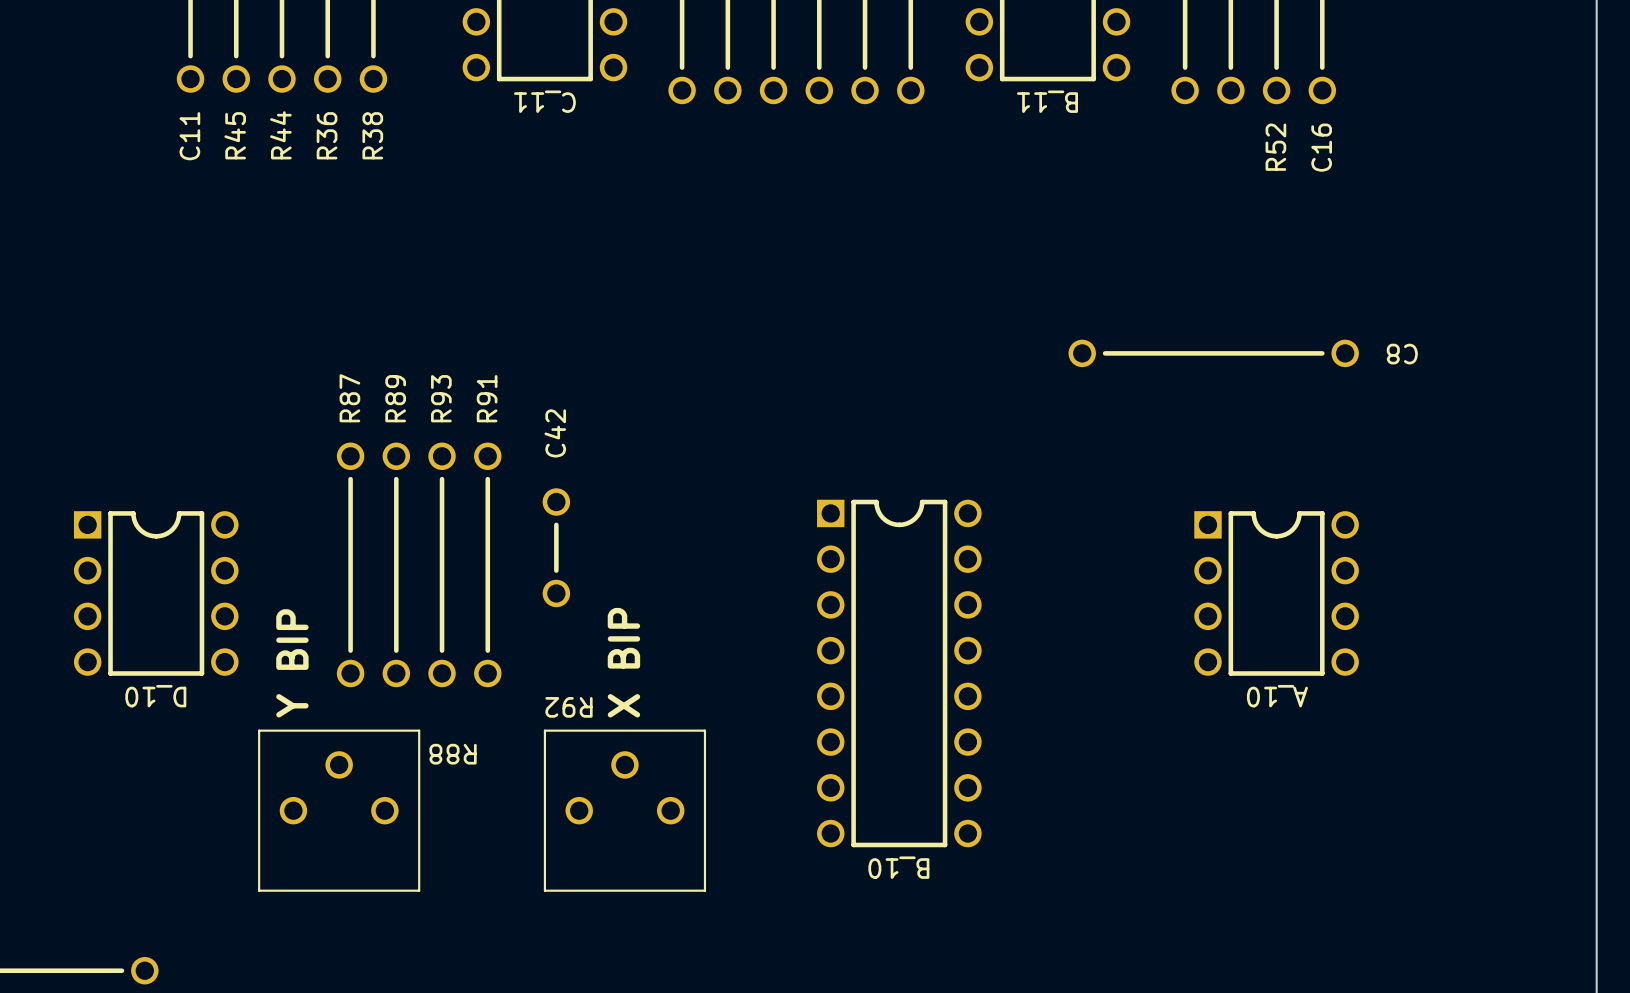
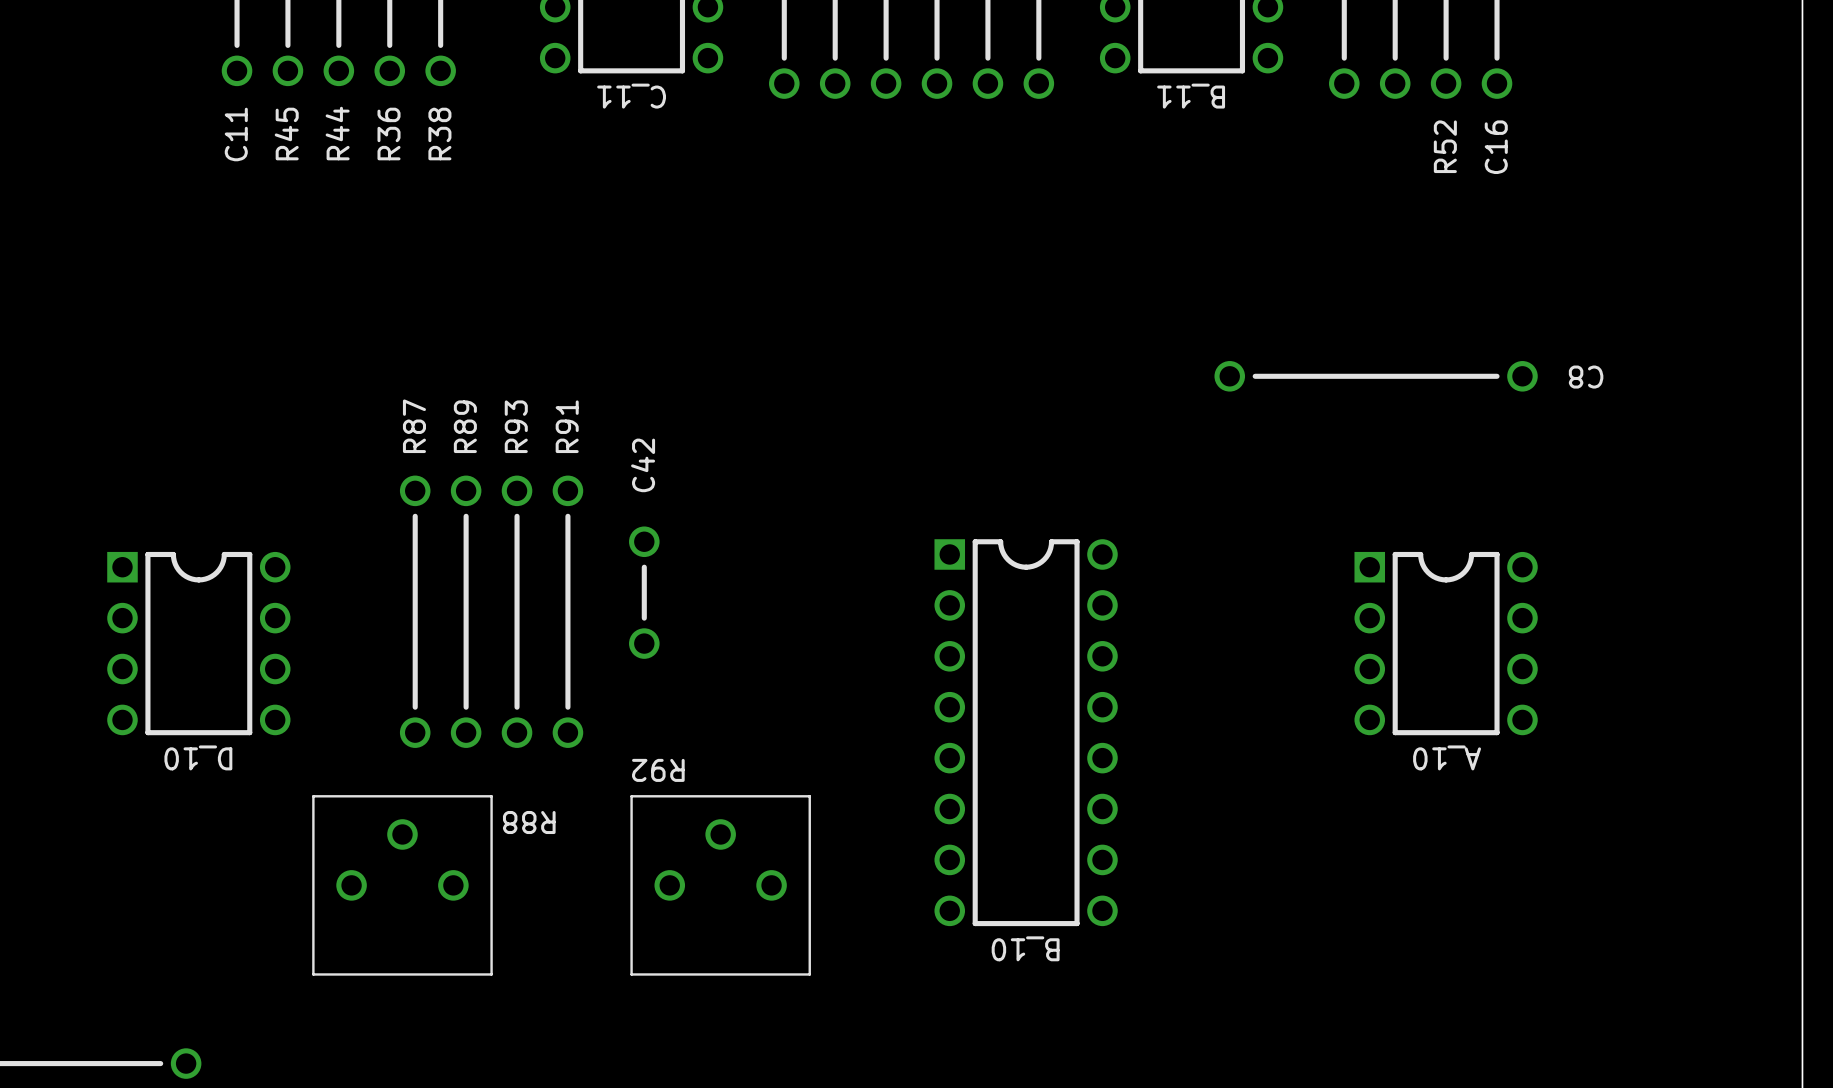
text: X BIP (623, 662) -> none
text: Y BIP (292, 663) -> none

